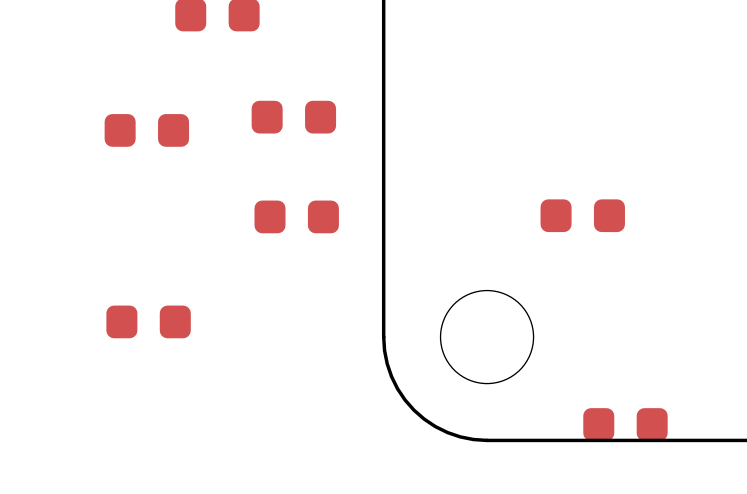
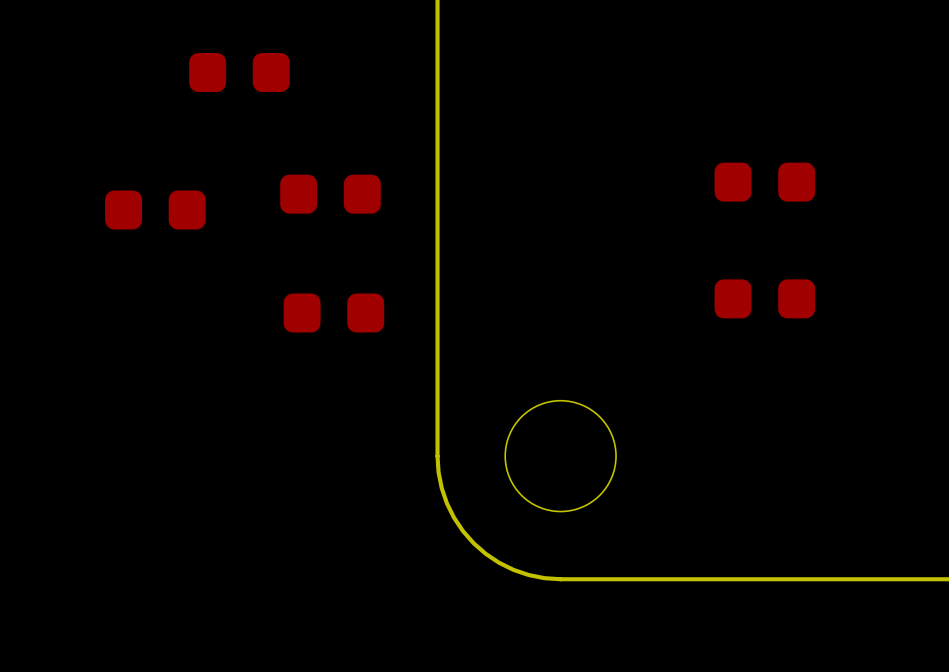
part: none -> (764, 182)
part: none -> (764, 298)
part: (582, 215) -> none
part: (148, 321) -> none
part: (625, 424) -> none

